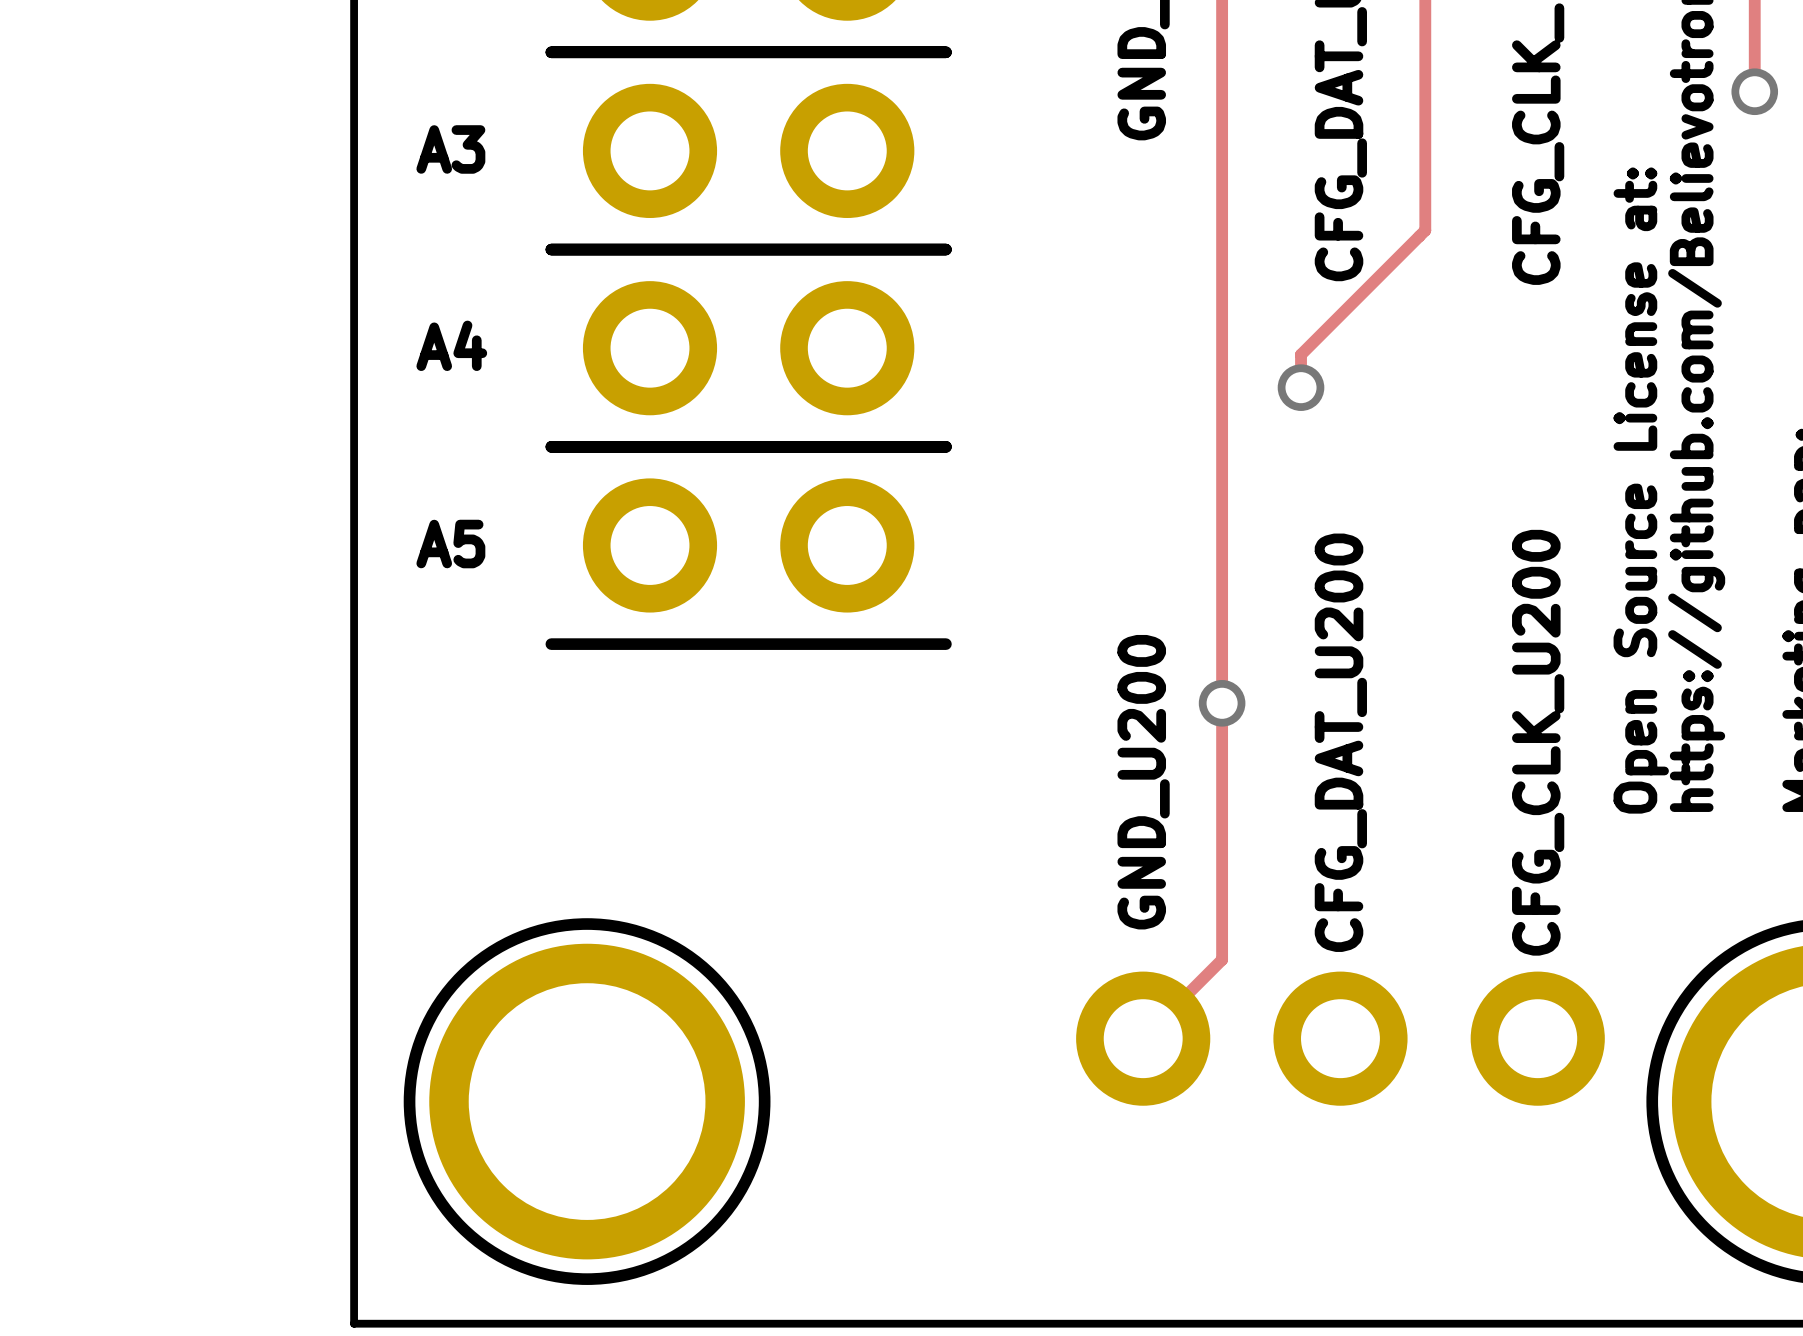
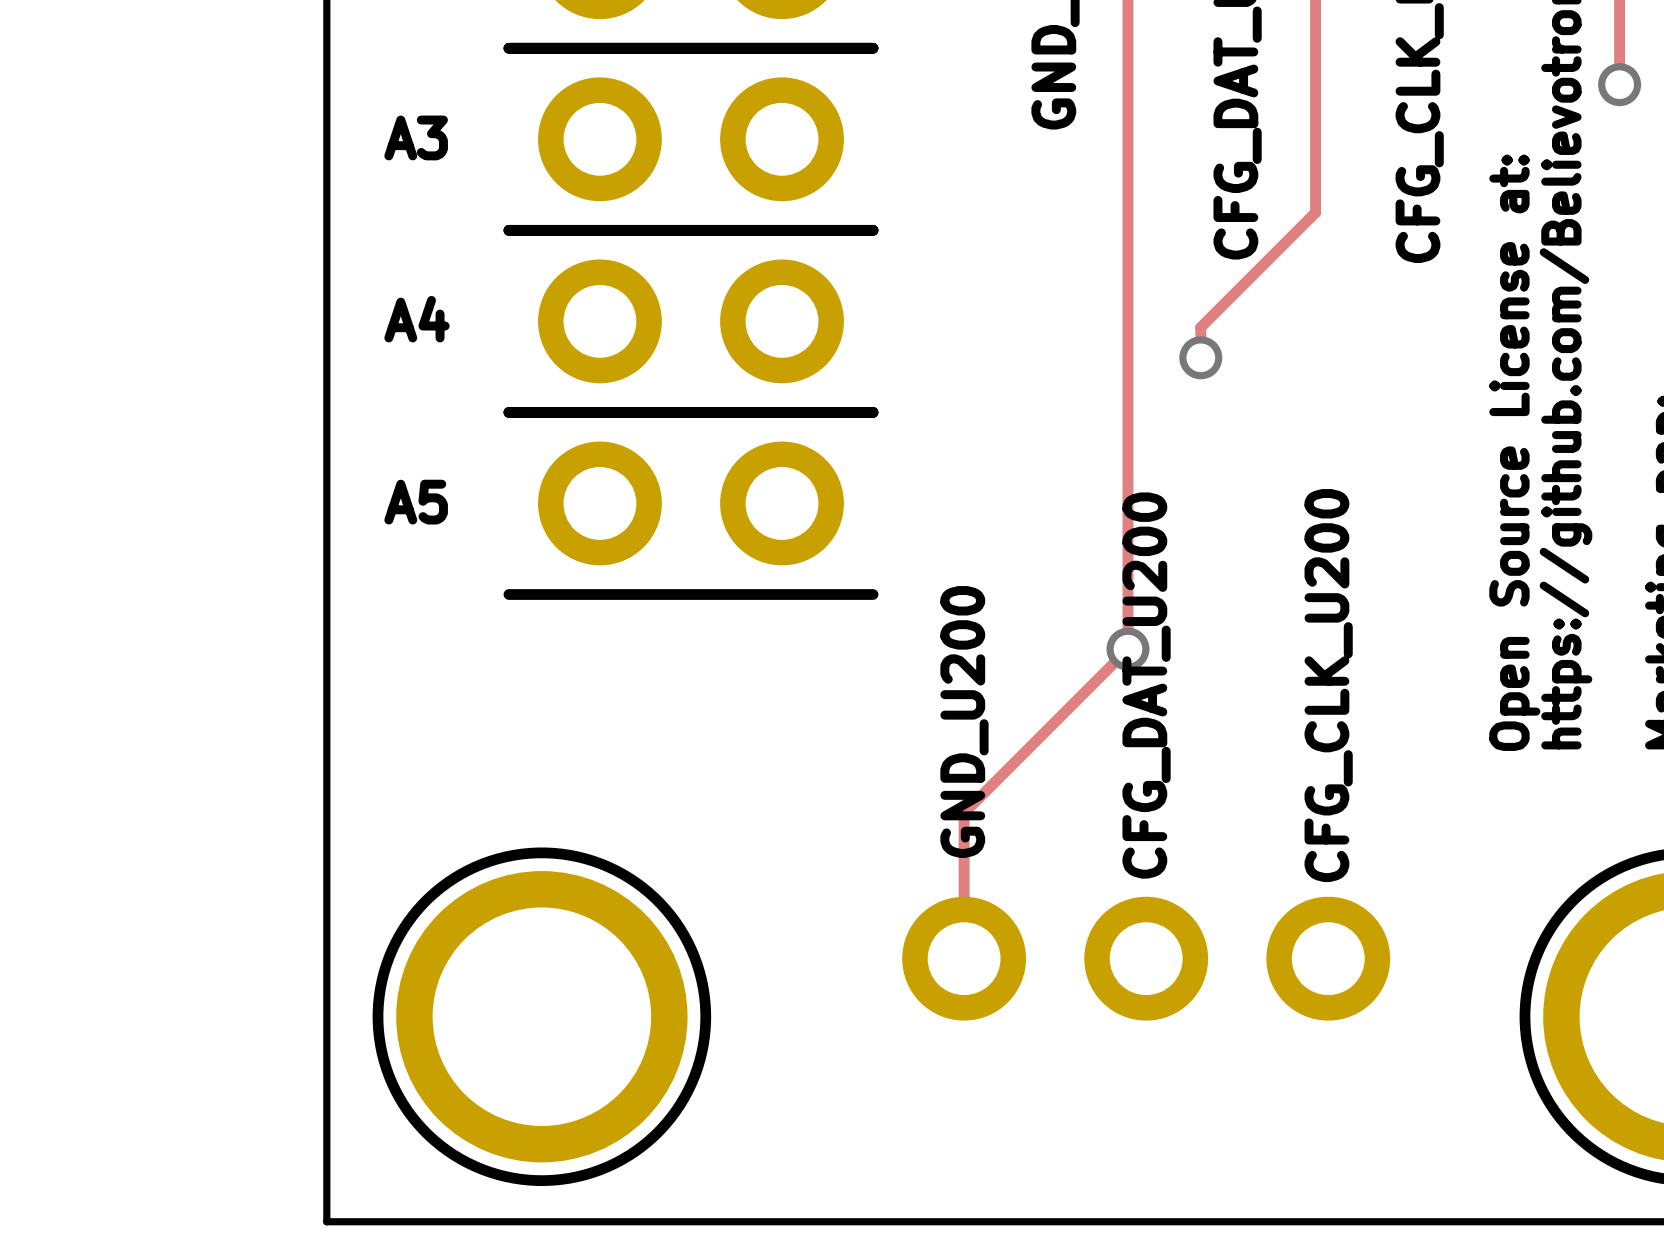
track: (1222, 703) (1222, 959) (1143, 1038) -> (1127, 649) (964, 813) (964, 958)
GND_U200 position: (1143, 1038) -> (964, 958)
CFG_DAT_U200 position: (1340, 1038) -> (1146, 958)
CFG_CLK_U200 position: (1537, 1038) -> (1328, 958)

